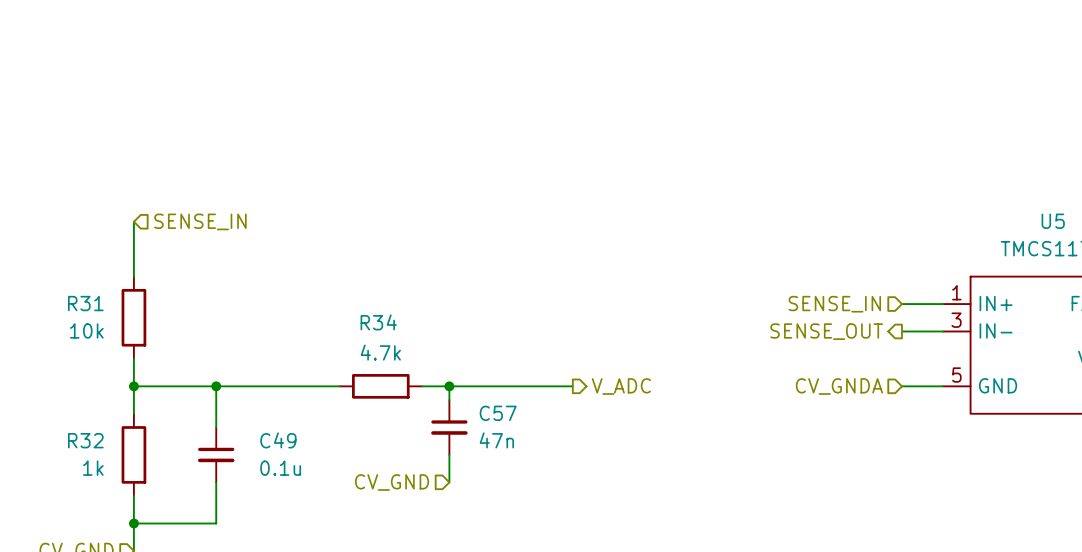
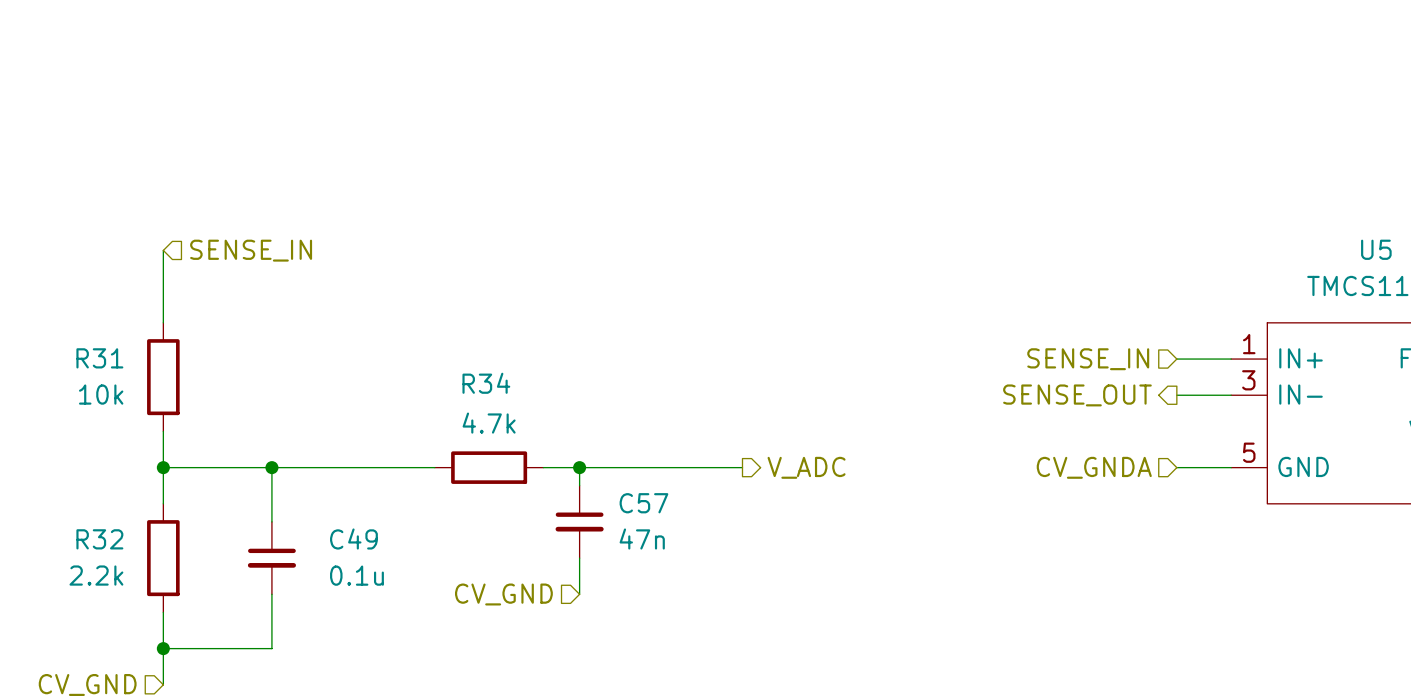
R32 value: 1k (93, 468) -> 2.2k (96, 575)

